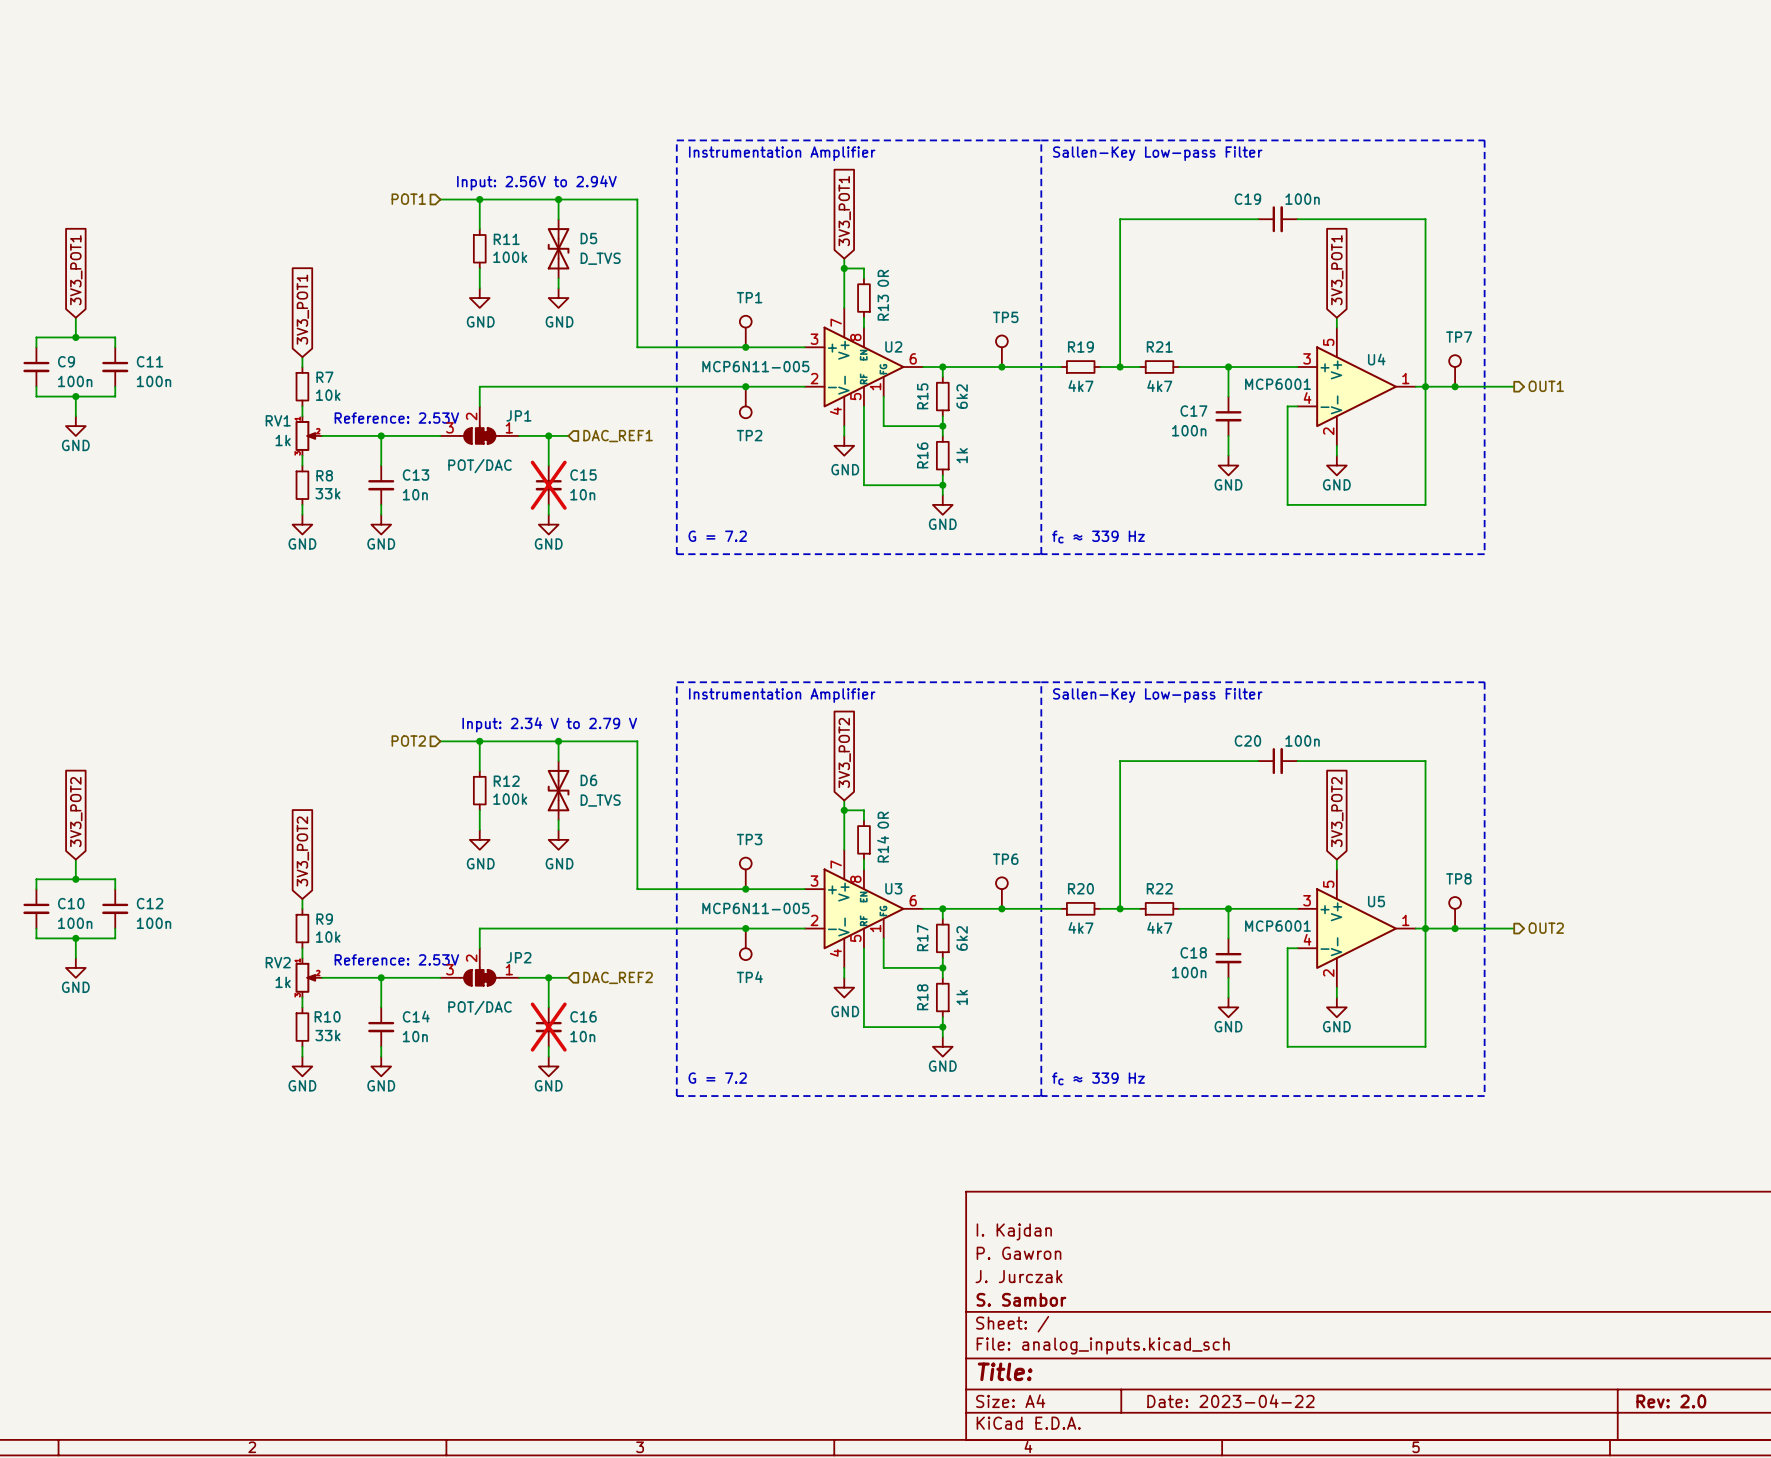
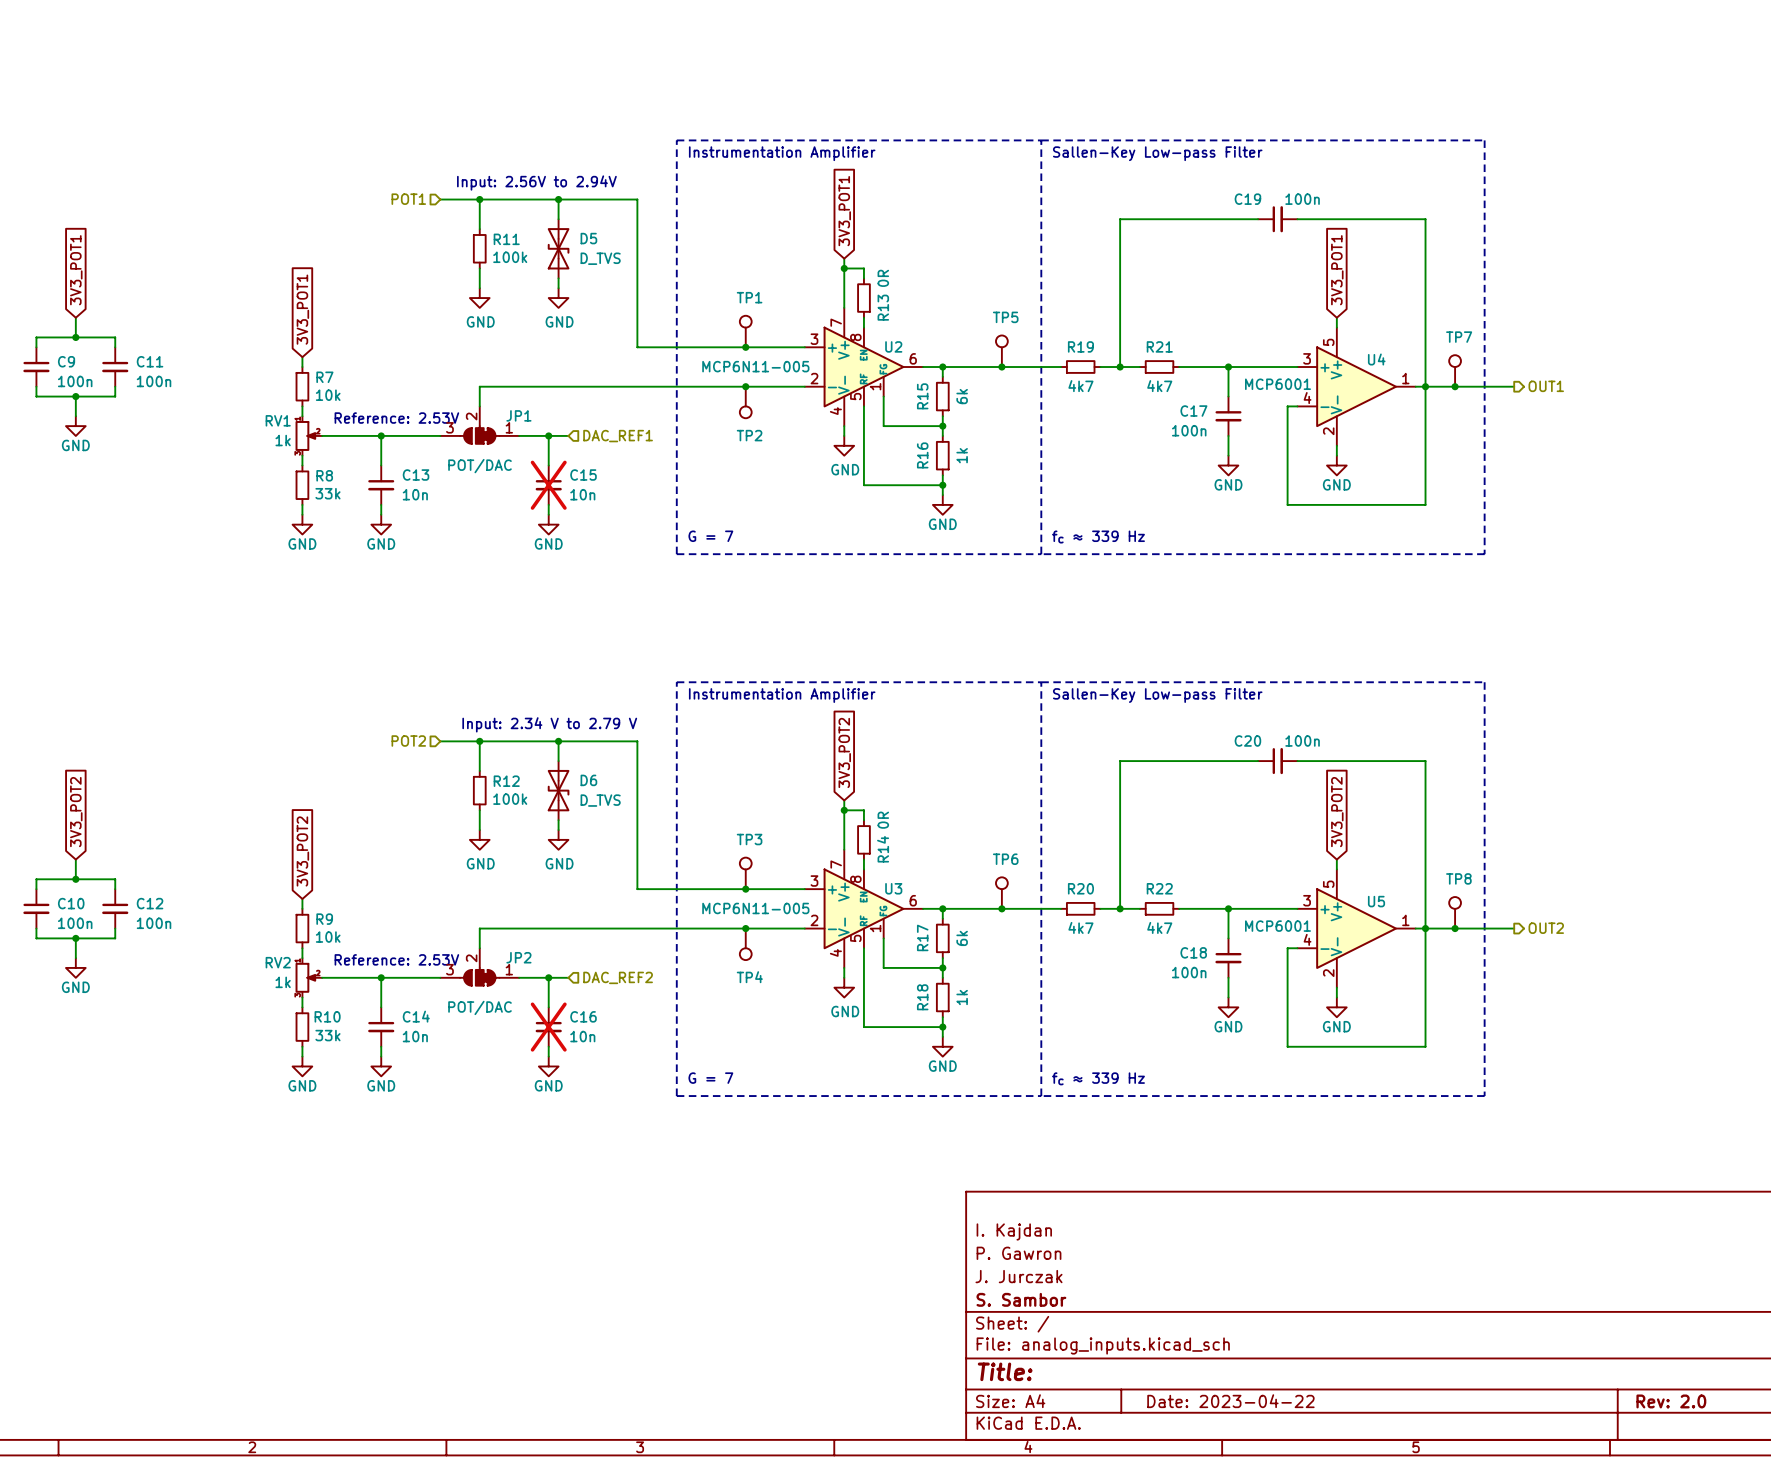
R15 value: 6k2 (962, 396) -> 6k (962, 396)
text: G = 7.2 (717, 536) -> G = 7 (710, 536)
R17 value: 6k2 (962, 938) -> 6k (962, 938)
text: G = 7.2 (717, 1078) -> G = 7 (710, 1078)

